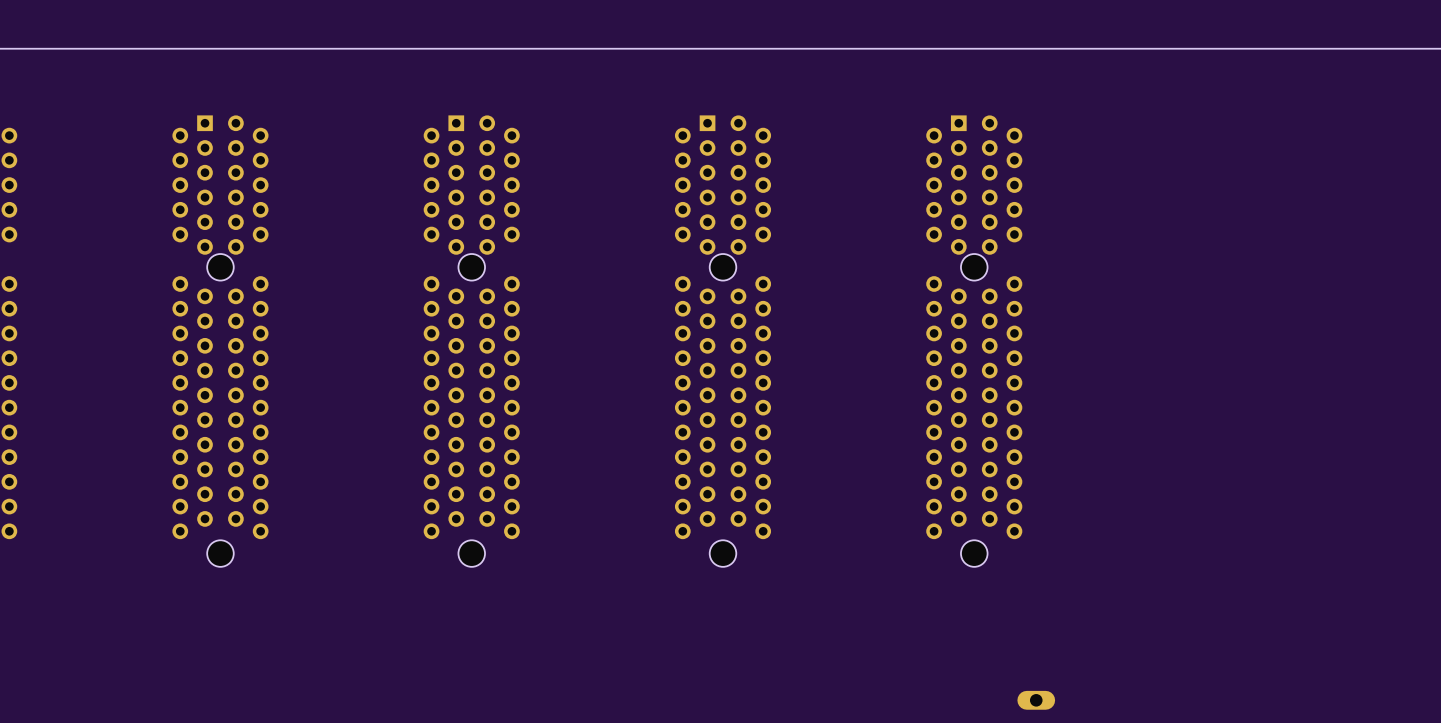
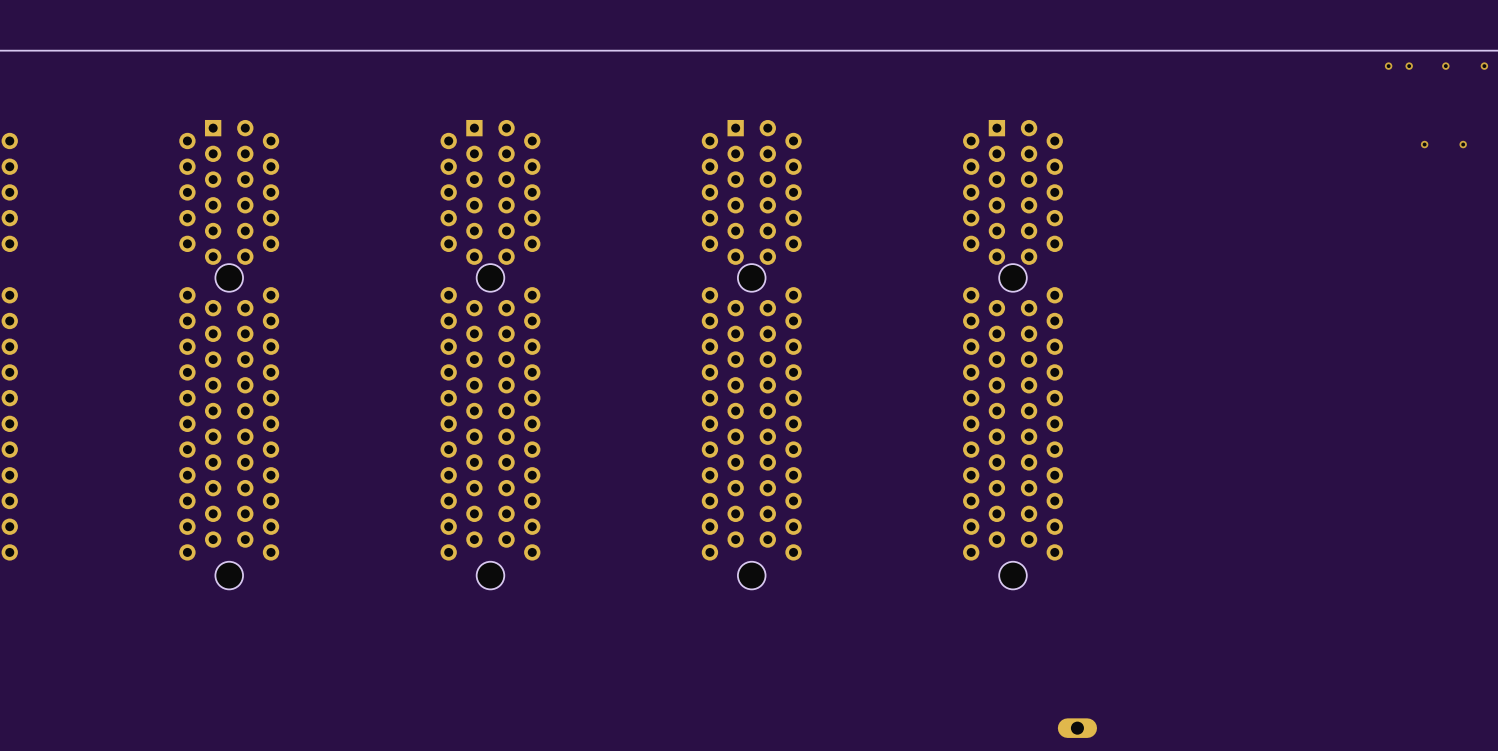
via: none -> (1388, 66)
via: none -> (1409, 66)
via: none -> (1445, 66)
via: none -> (1484, 66)
via: none -> (1424, 144)
via: none -> (1463, 144)

